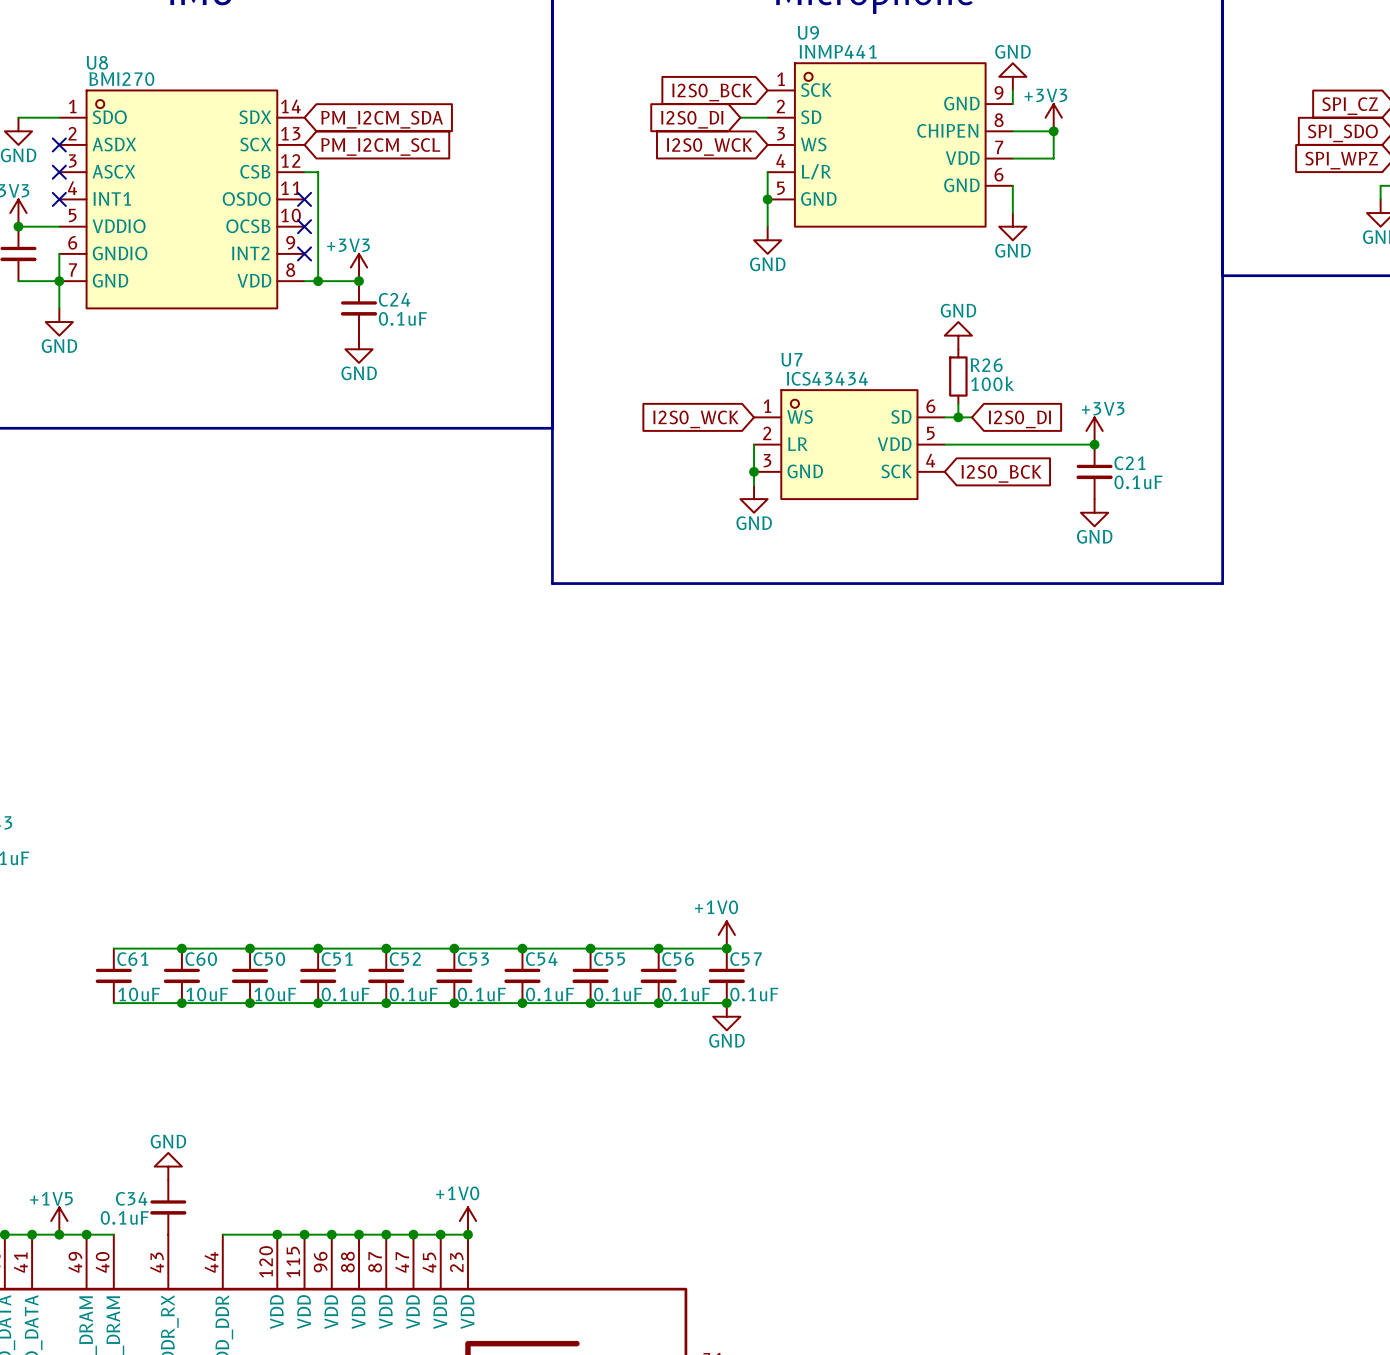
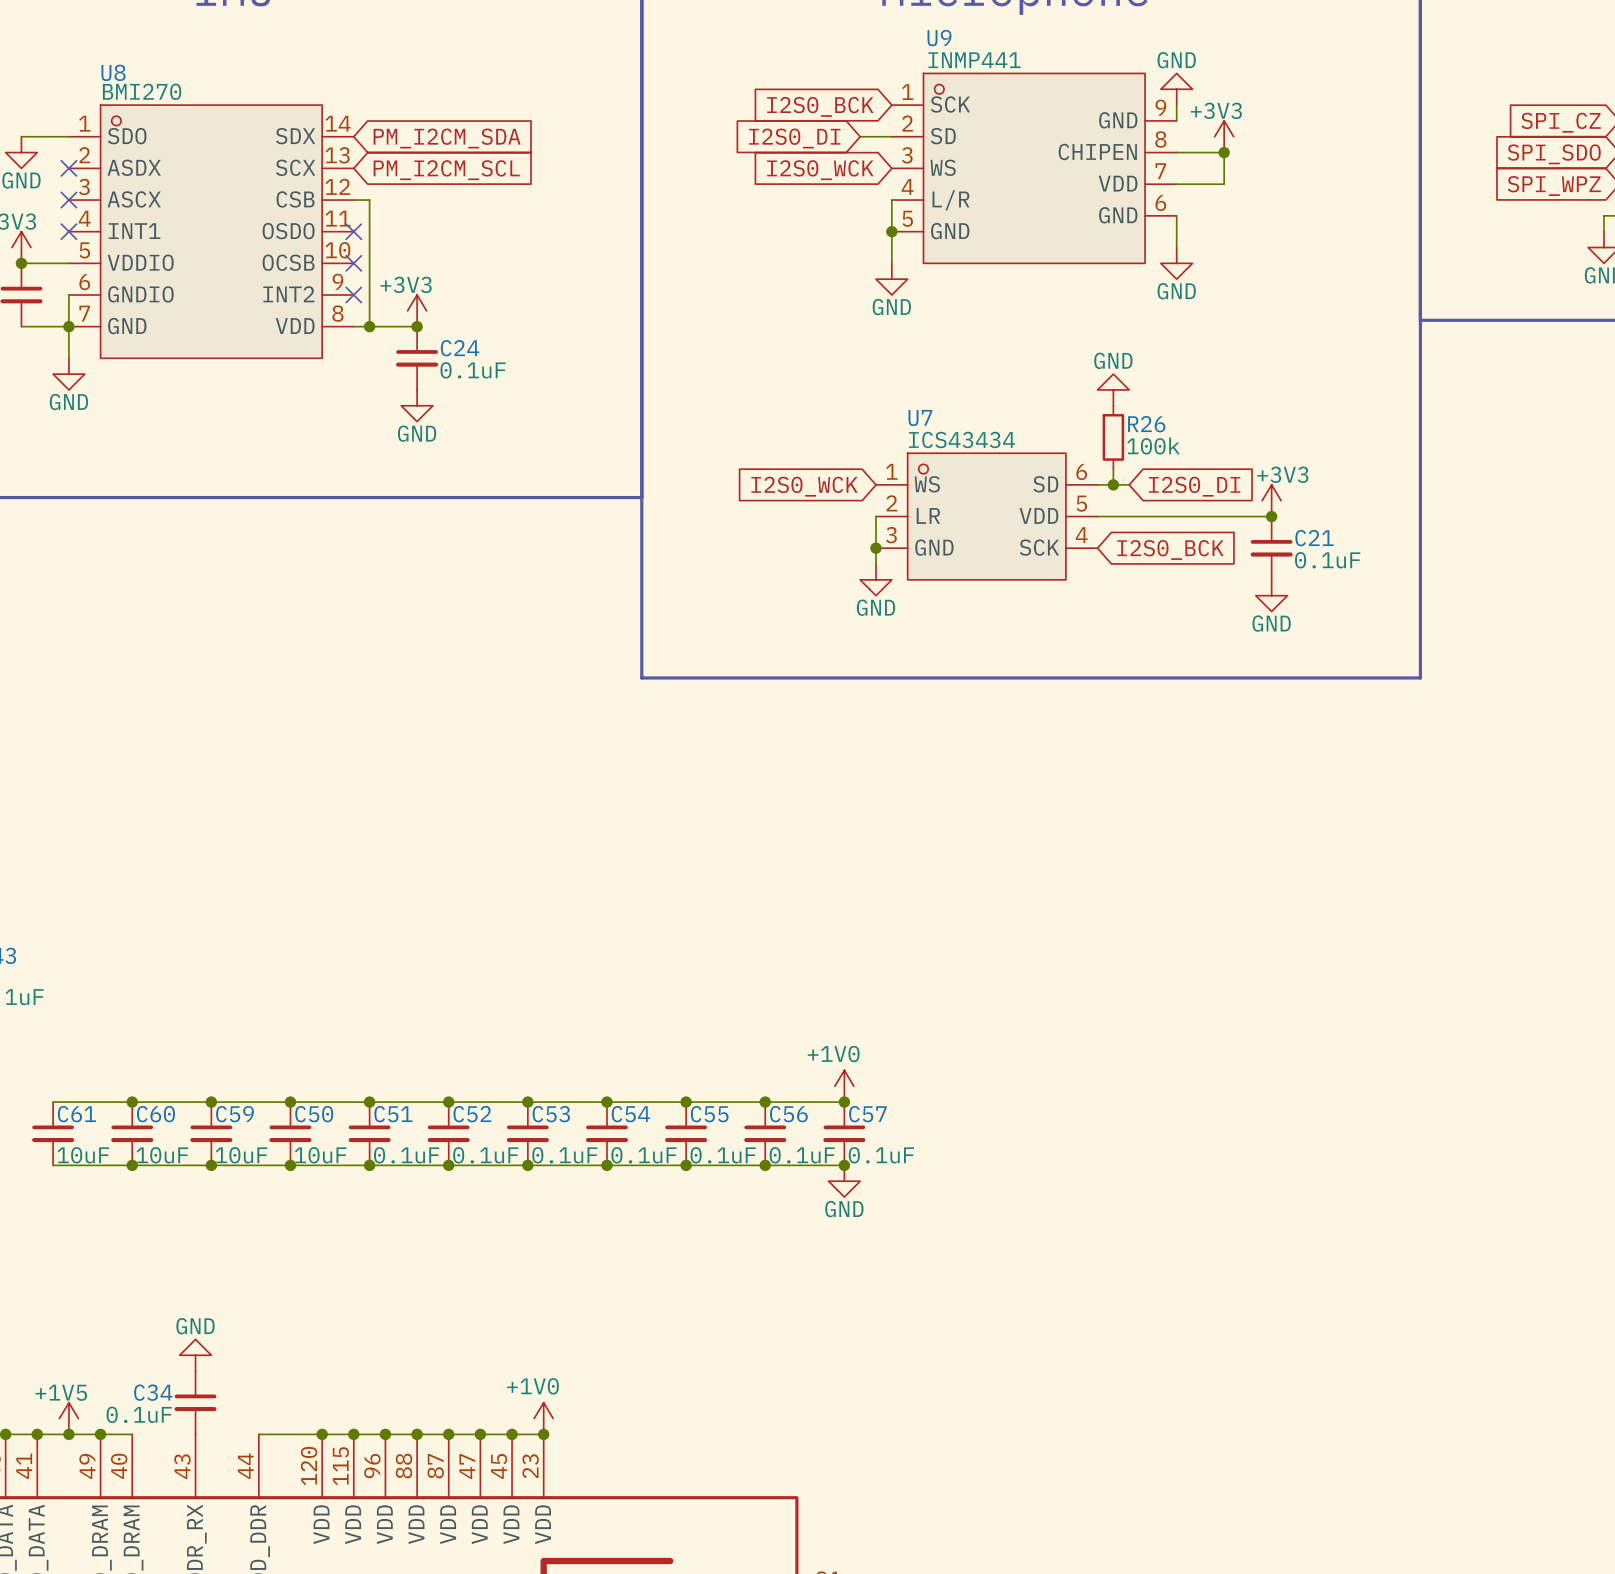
wire: none -> (53, 1102) (132, 1102)
junction: none -> (132, 1102)
C61 name: C61 (132, 959) -> C60 (155, 1114)
C60 name: C60 (201, 959) -> C59 (234, 1114)
C61: none -> 10uF (53, 1133)
wire: none -> (53, 1165) (132, 1165)
junction: none -> (132, 1165)

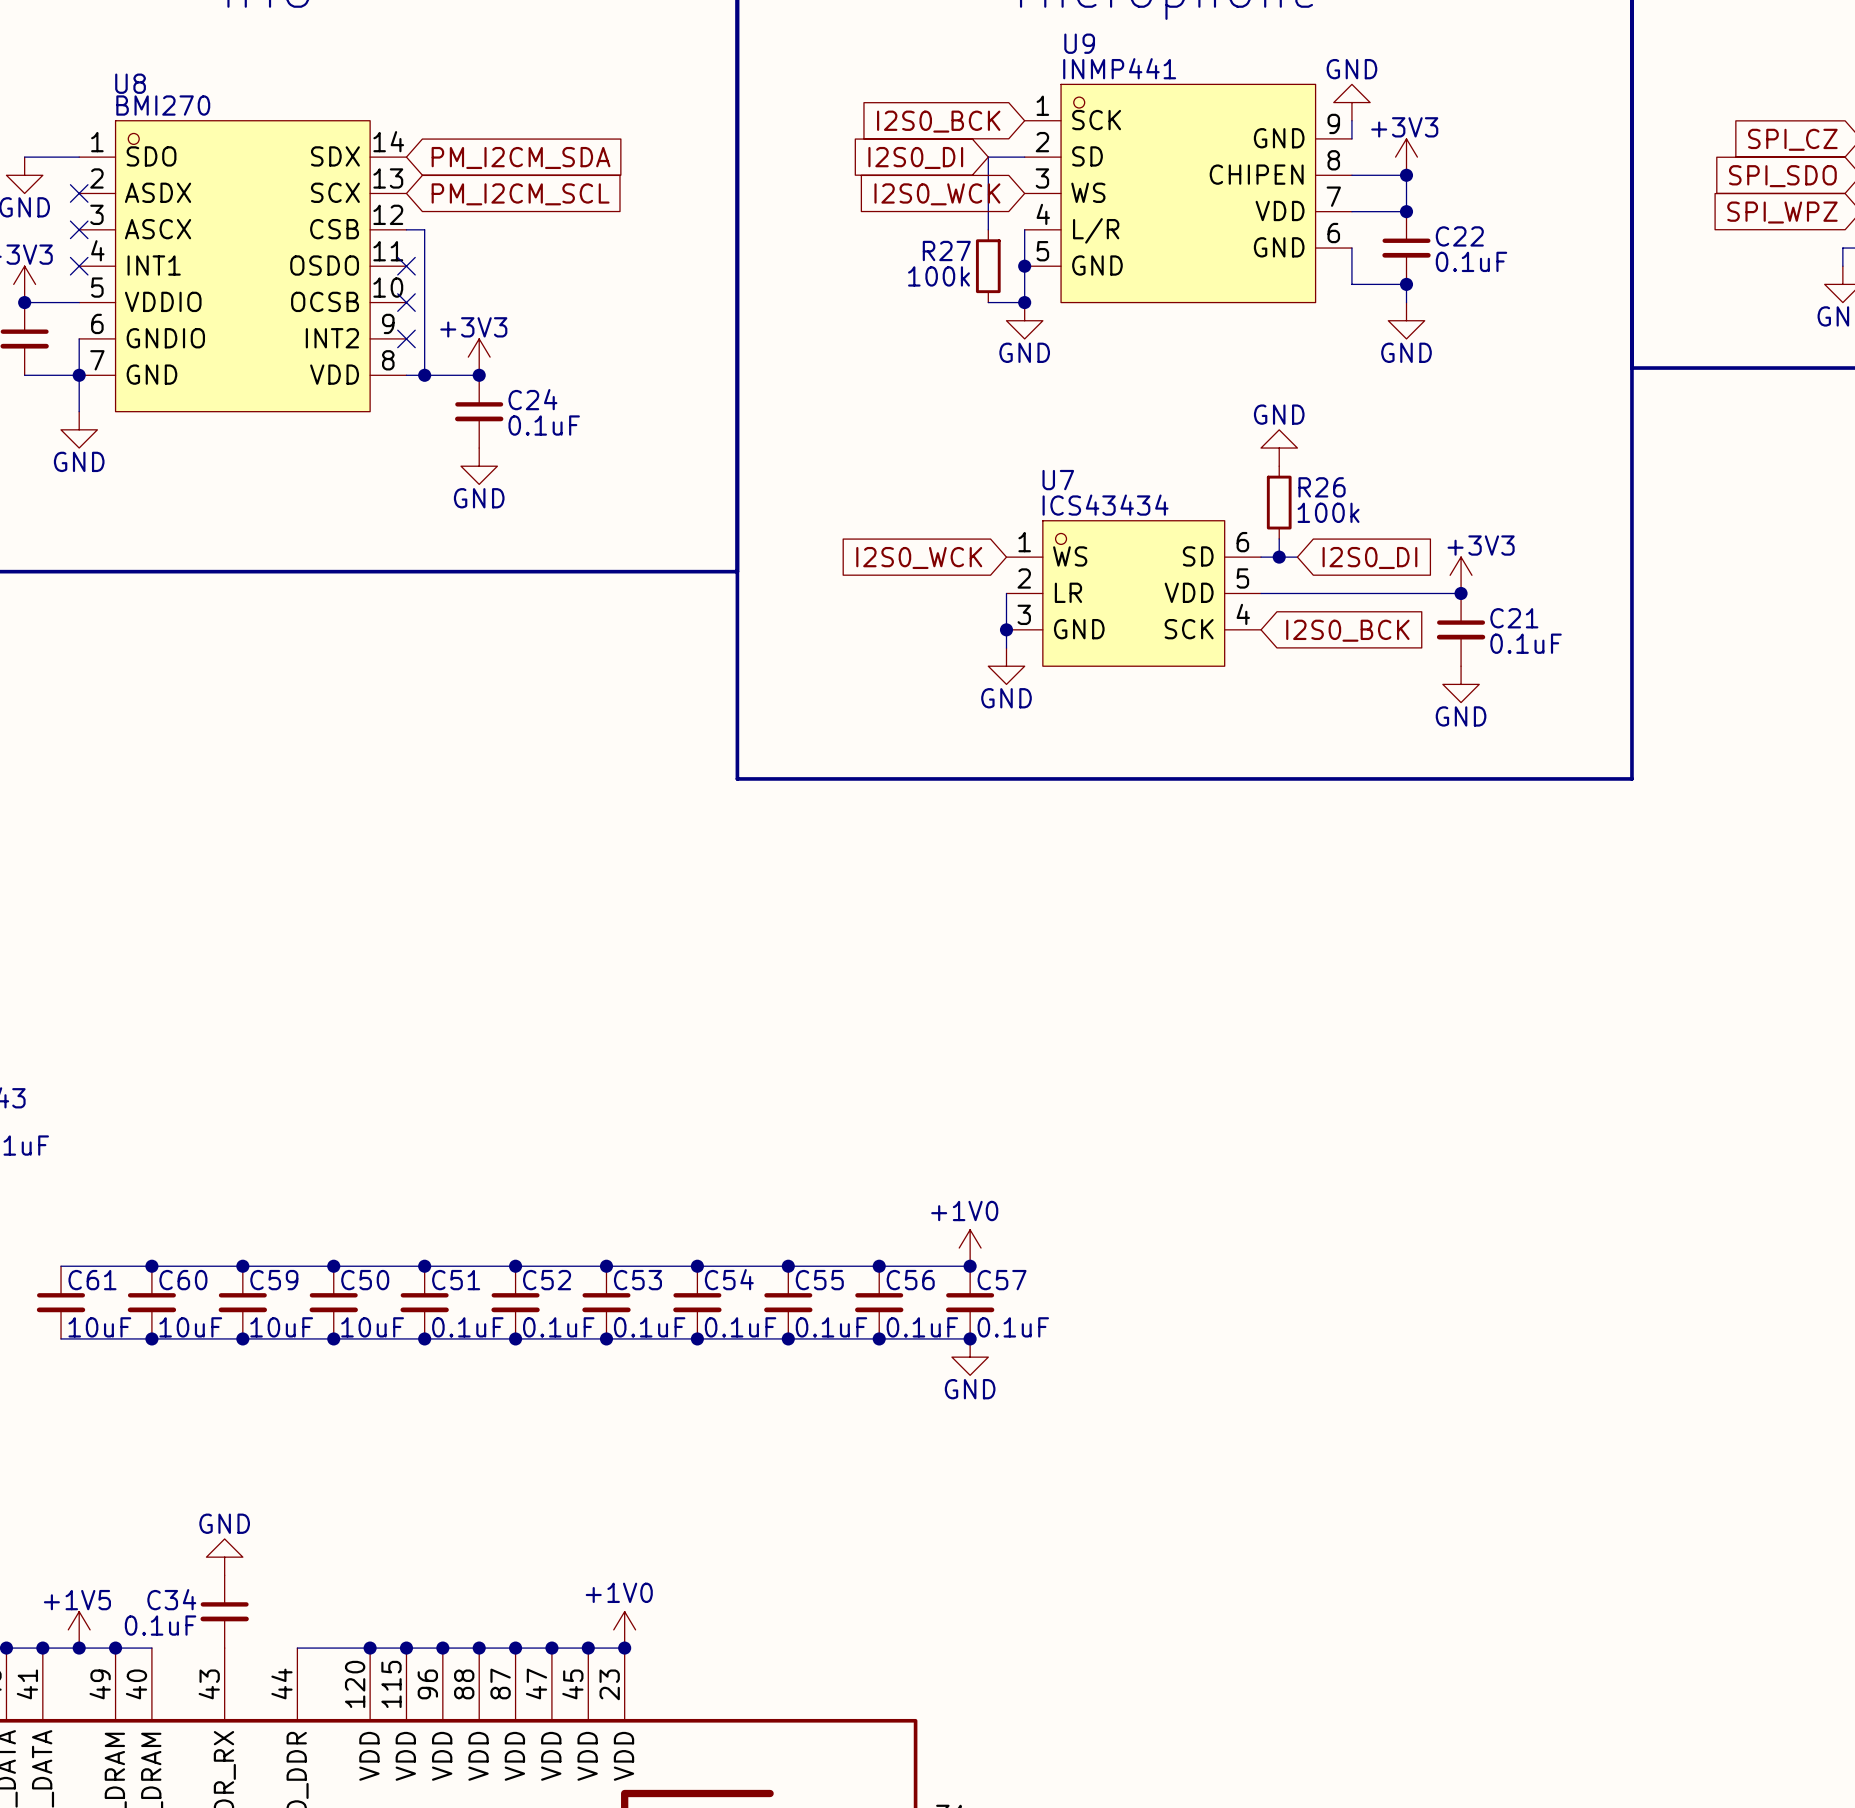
wire: none -> (988, 157) (988, 229)
junction: none -> (1406, 211)
C22: none -> 0.1uF (1406, 248)
R27: none -> 100k (988, 266)
wire: none -> (1351, 284) (1406, 284) (1406, 302)
junction: none -> (1406, 284)
wire: none -> (988, 302) (1024, 302)
junction: none -> (1024, 302)
power symbol position: GND (1176, 263) -> GND (1406, 320)

